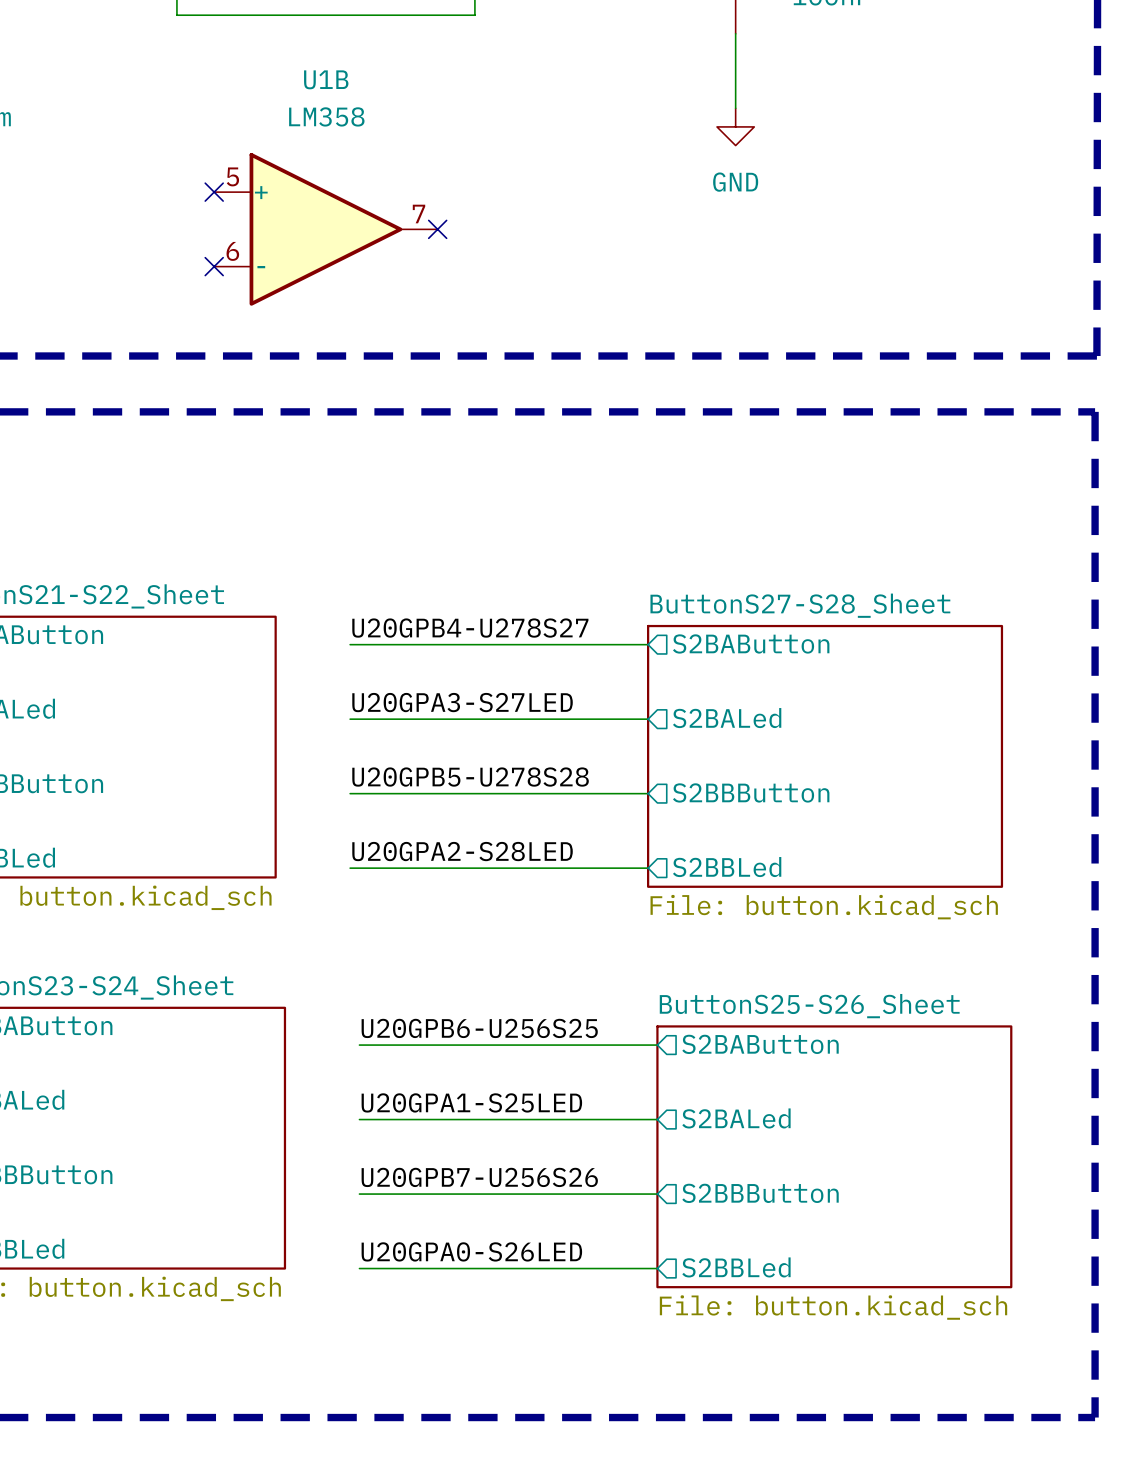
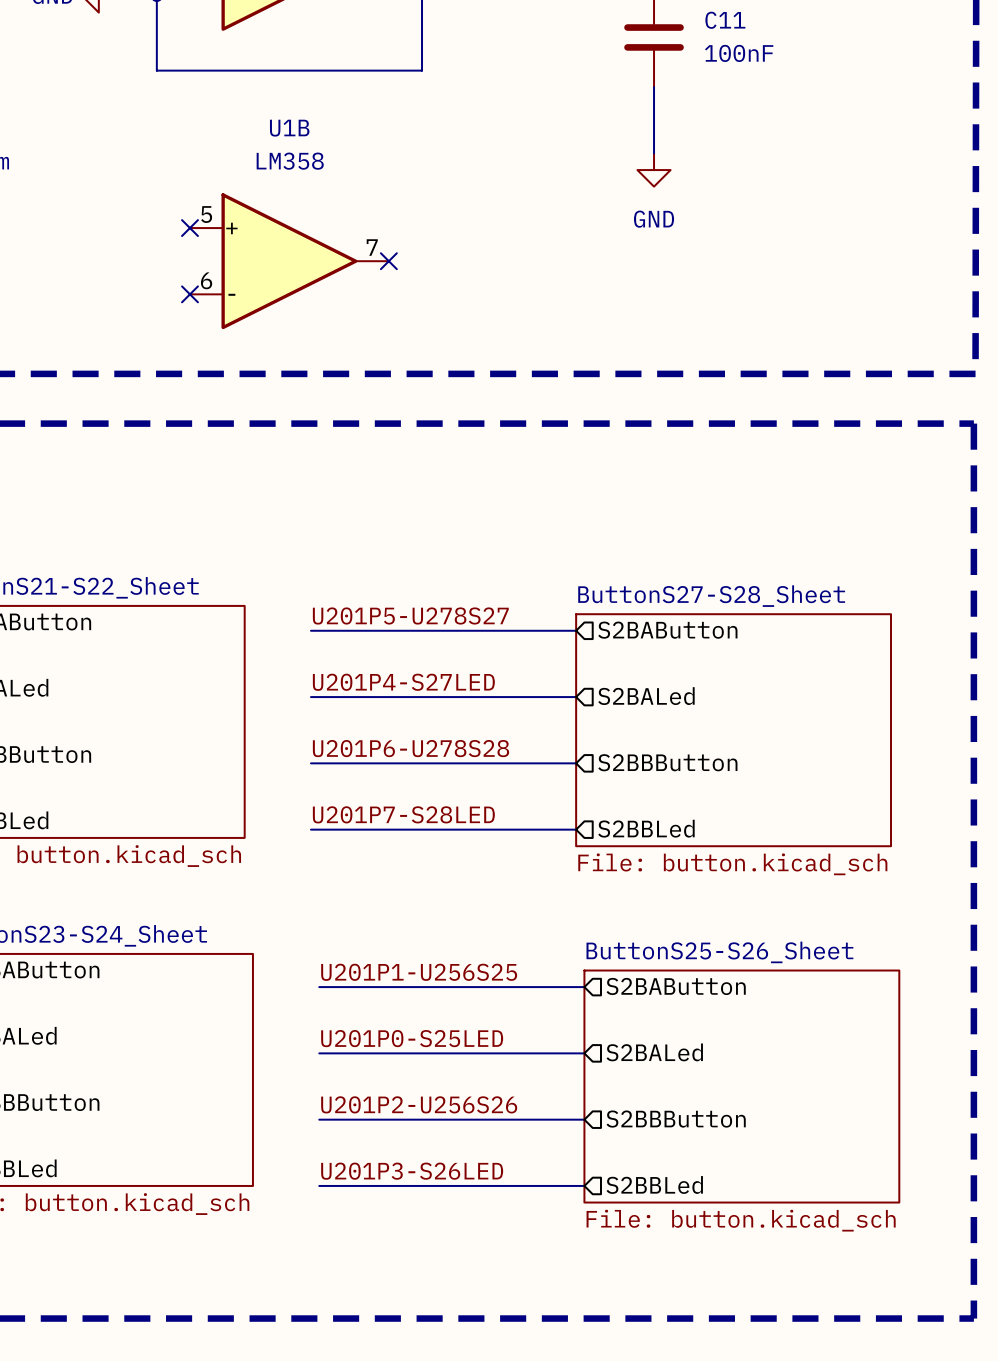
label: U20GPB4-U278S27 (470, 628) -> U201P5-U278S27 (410, 615)
label: U20GPA3-S27LED (462, 702) -> U201P4-S27LED (403, 682)
label: U20GPB5-U278S28 (470, 777) -> U201P6-U278S28 (410, 748)
label: U20GPA2-S28LED (462, 851) -> U201P7-S28LED (403, 814)
label: U20GPB6-U256S25 (479, 1028) -> U201P1-U256S25 (419, 972)
label: U20GPA1-S25LED (471, 1102) -> U201P0-S25LED (412, 1038)
label: U20GPB7-U256S26 (479, 1177) -> U201P2-U256S26 (419, 1104)
label: U20GPA0-S26LED (471, 1251) -> U201P3-S26LED (412, 1171)

